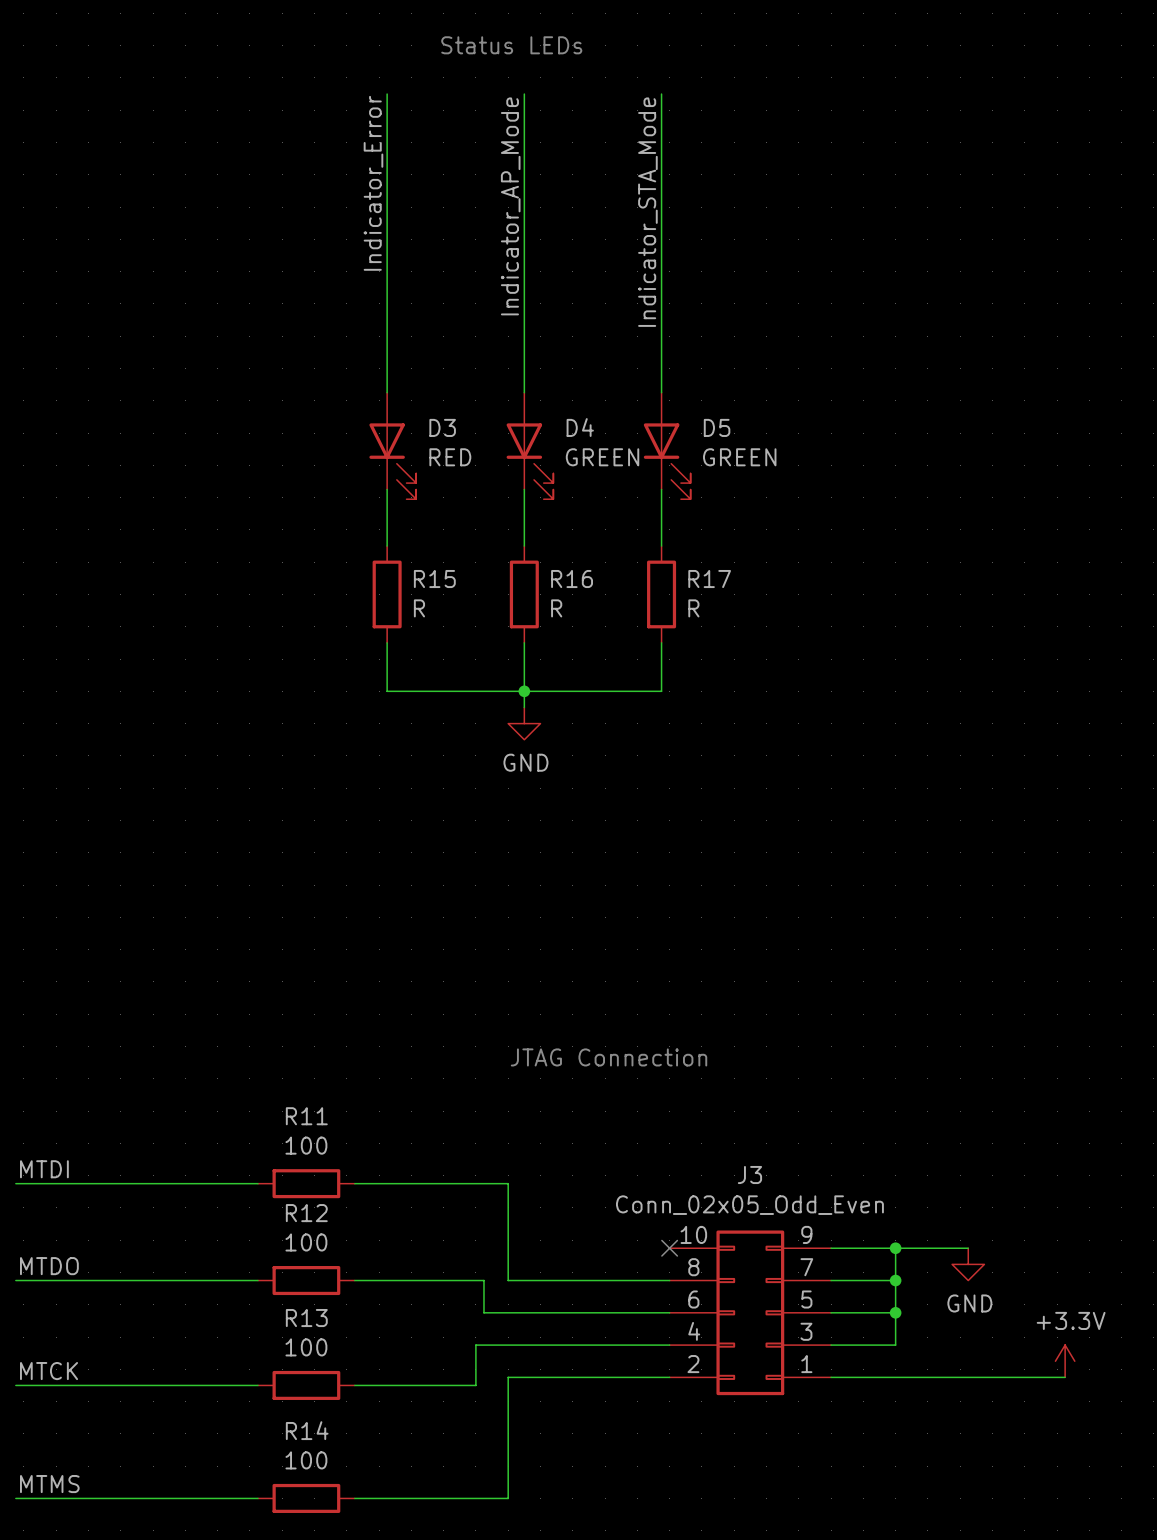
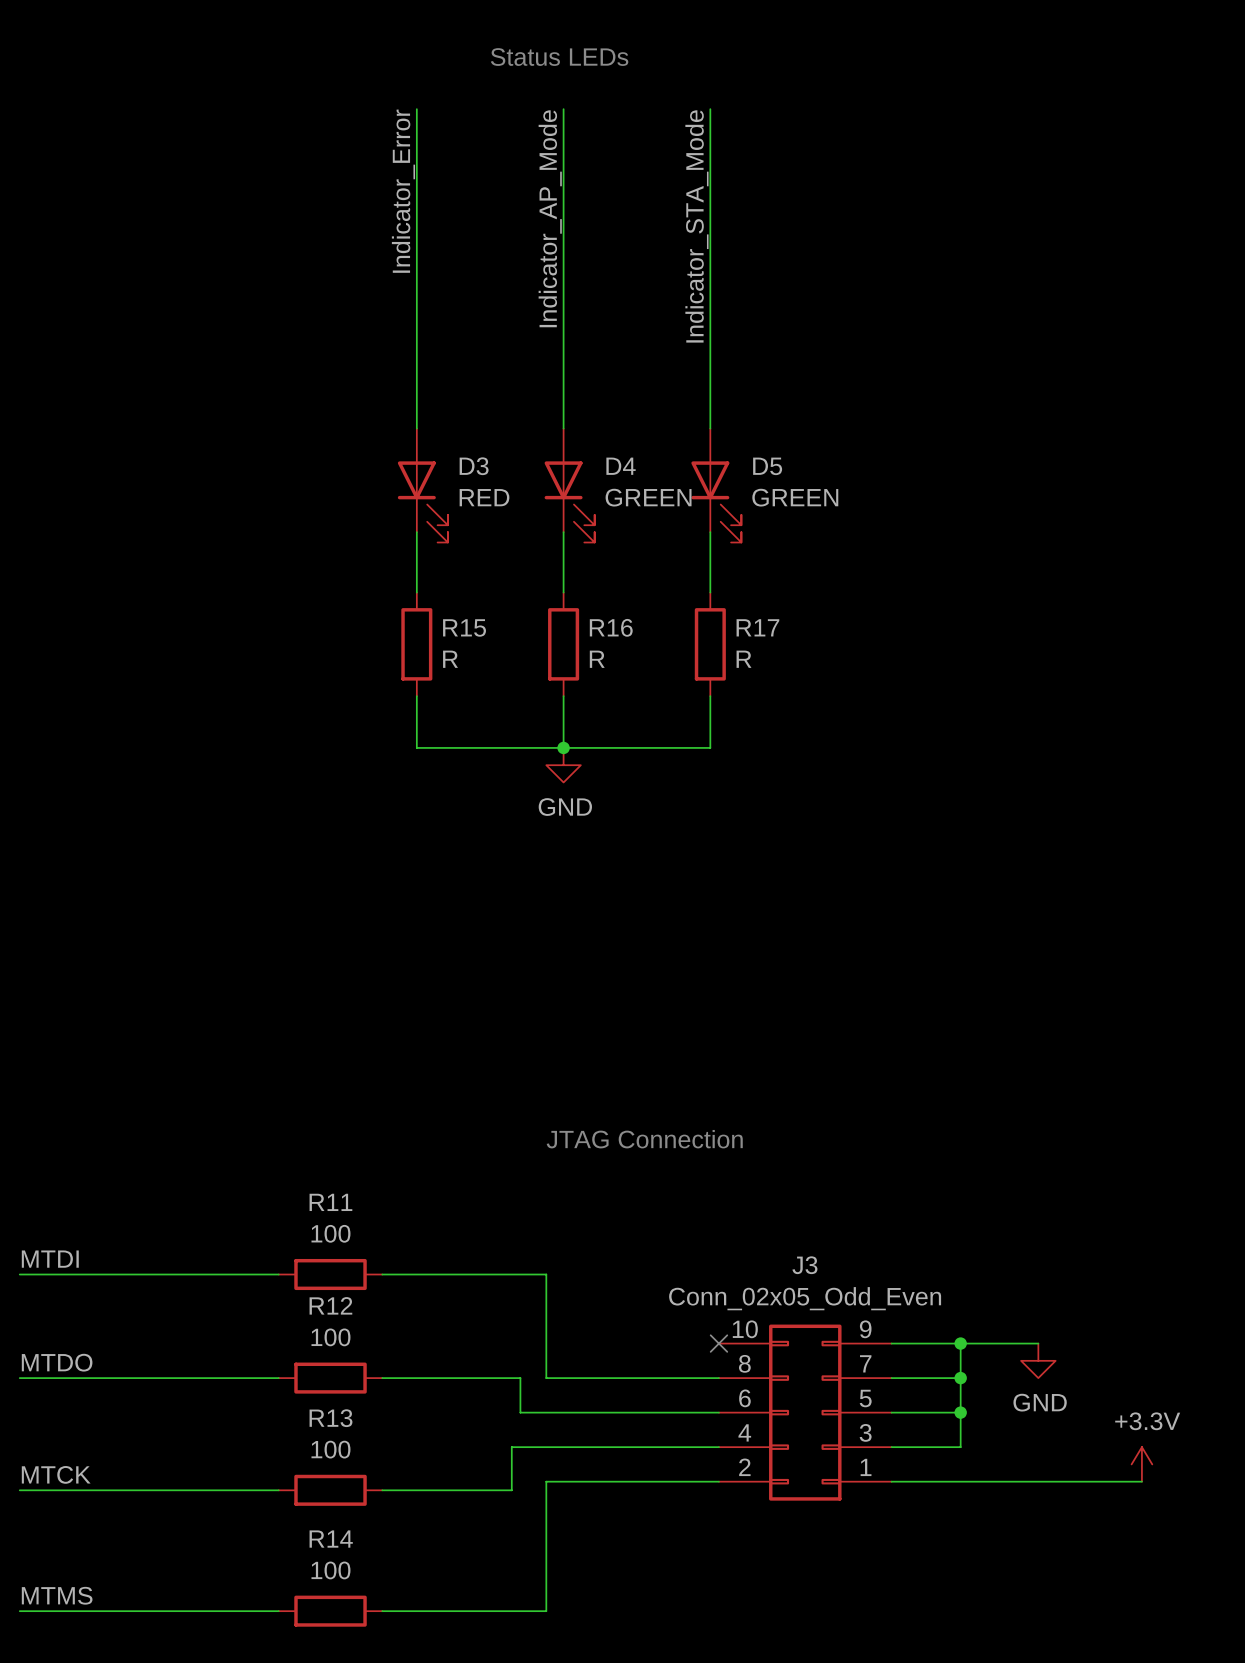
power symbol position: GND (524, 723) -> GND (563, 765)

